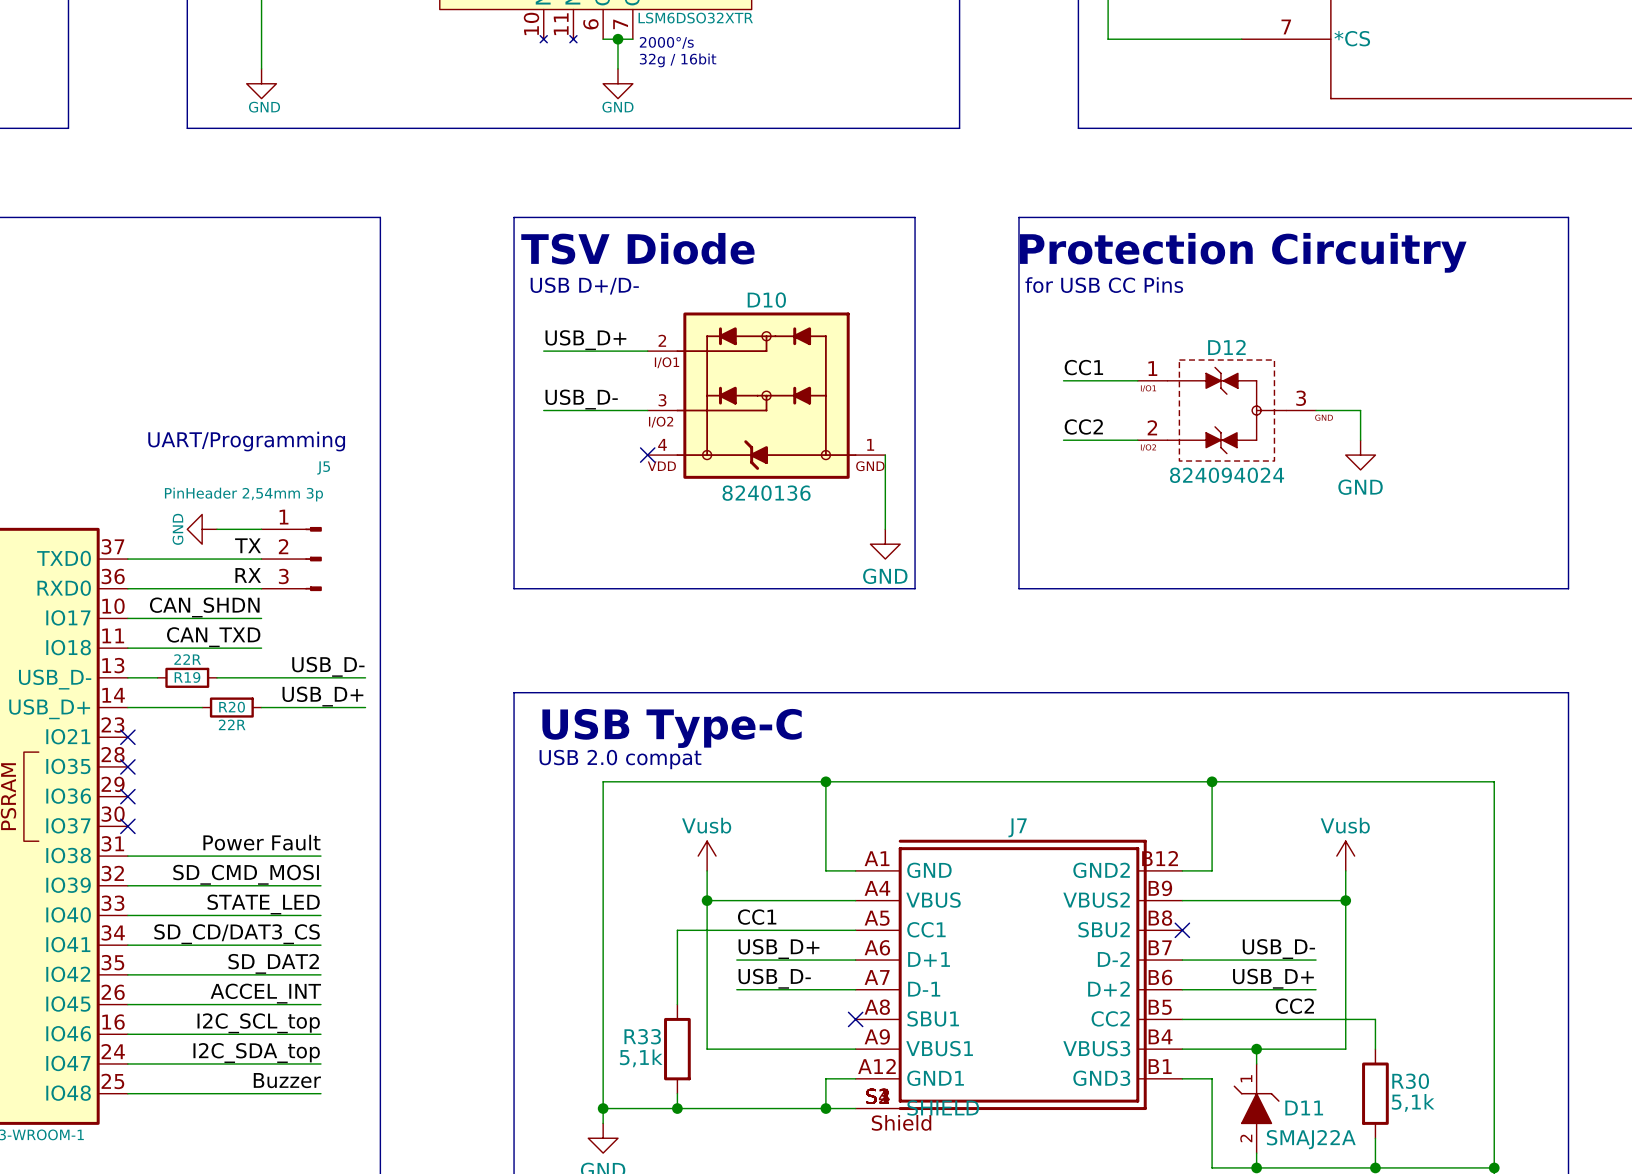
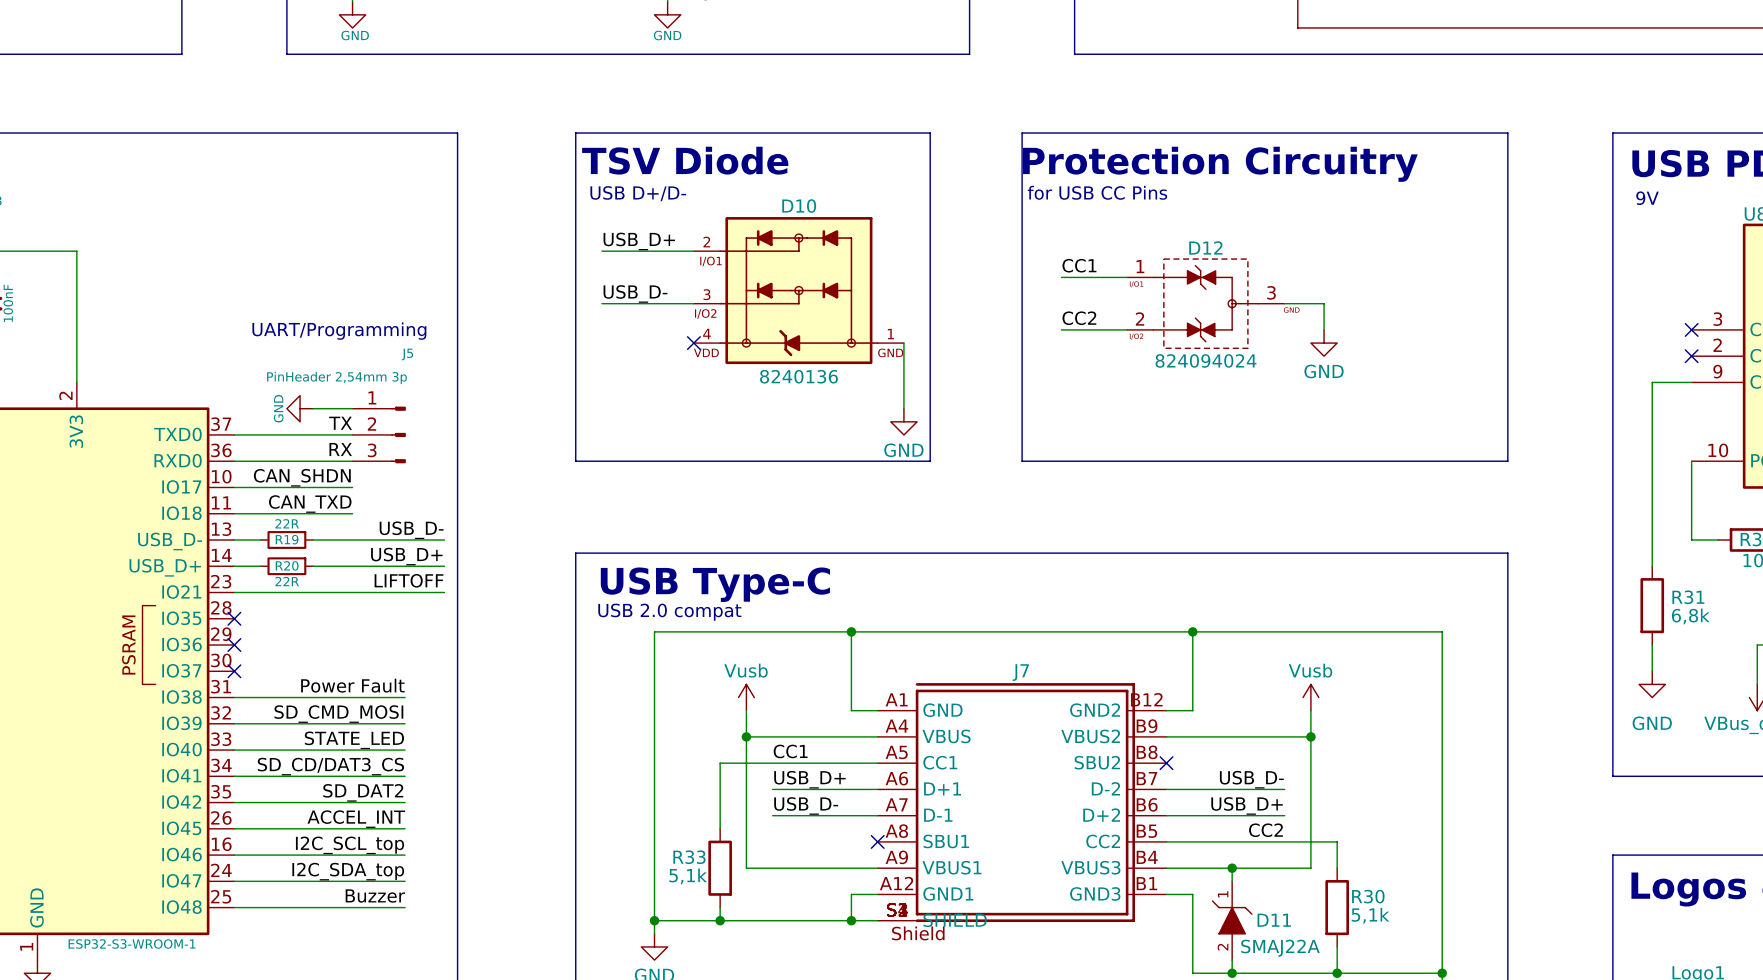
wire: (157, 707) (202, 707) -> (313, 566) (352, 566)
R20 position: (231, 707) -> (286, 566)
label: none -> LIFTOFF (409, 580)
wire: none -> (234, 592) (444, 592)
no-connect mark: (127, 737) -> none

